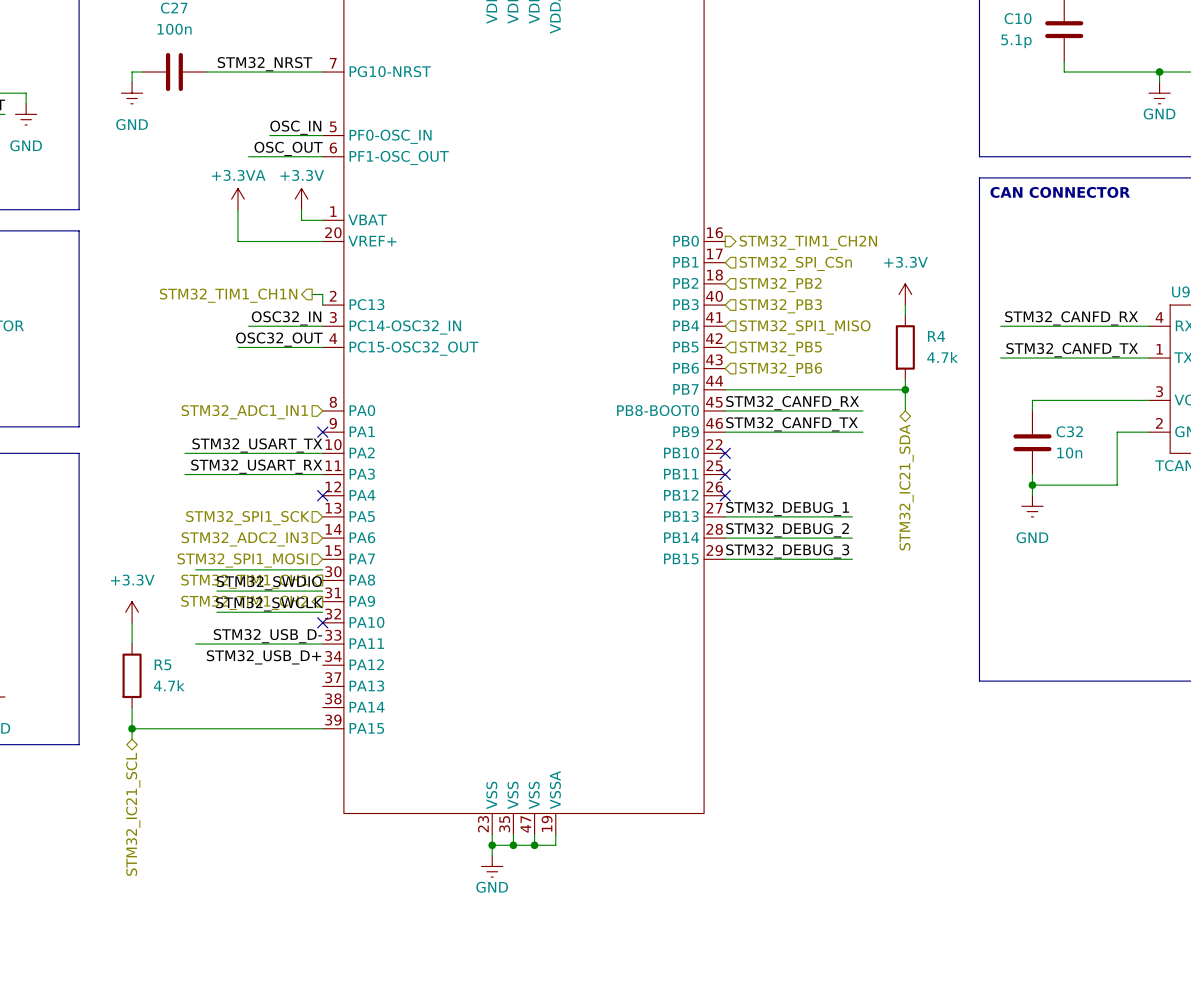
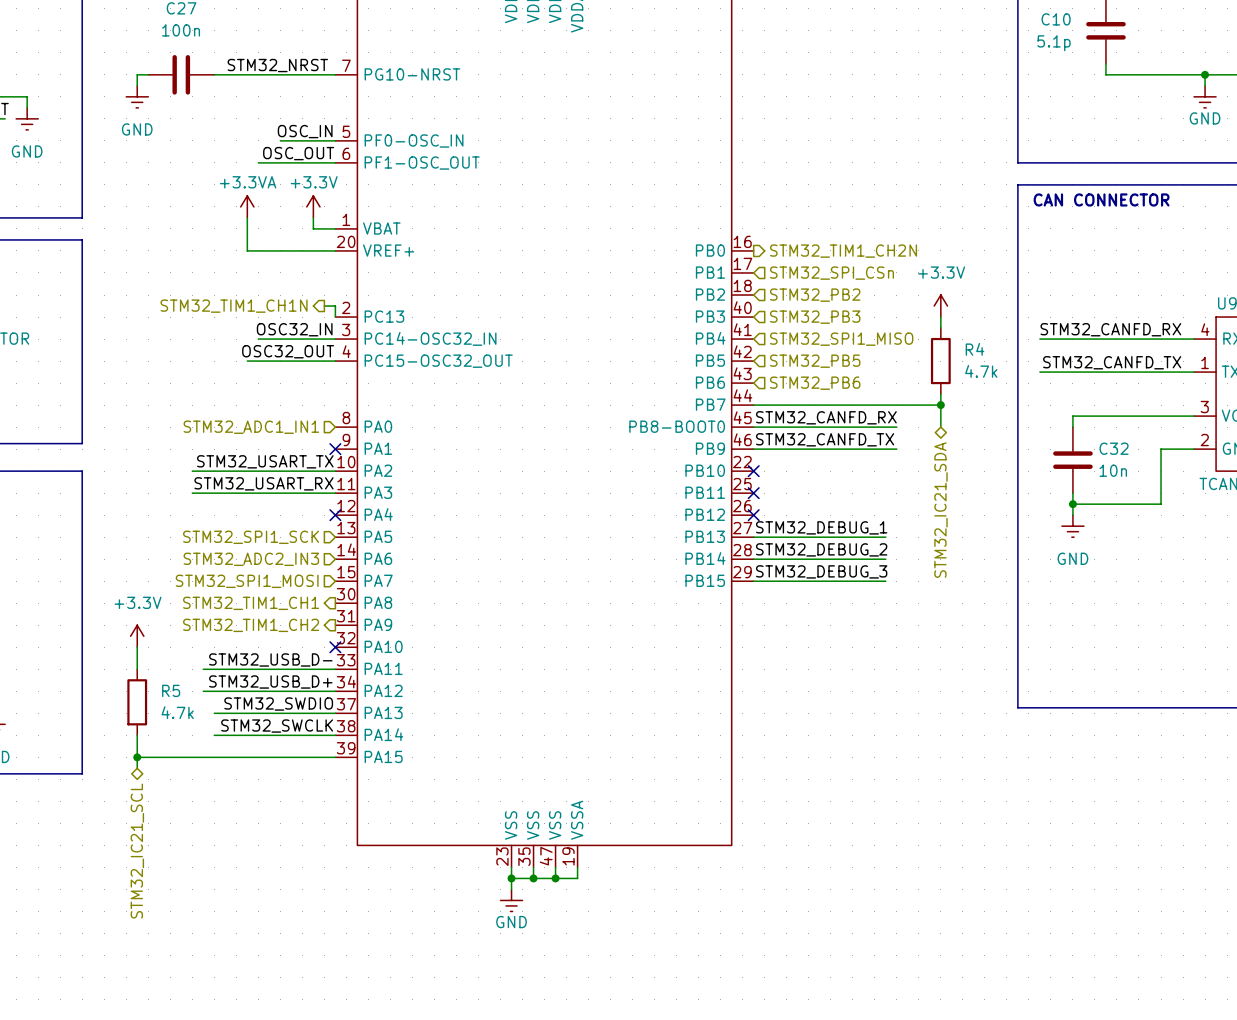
wire: (195, 569) (322, 569) -> (203, 691) (335, 691)
label position: STM32_SWDIO (269, 583) -> STM32_SWDIO (278, 704)
wire: (216, 591) (322, 591) -> none
label position: STM32_SWCLK (269, 604) -> STM32_SWCLK (277, 726)
wire: (216, 612) (322, 612) -> none
wire: none -> (214, 713) (335, 713)
wire: none -> (214, 735) (335, 735)

